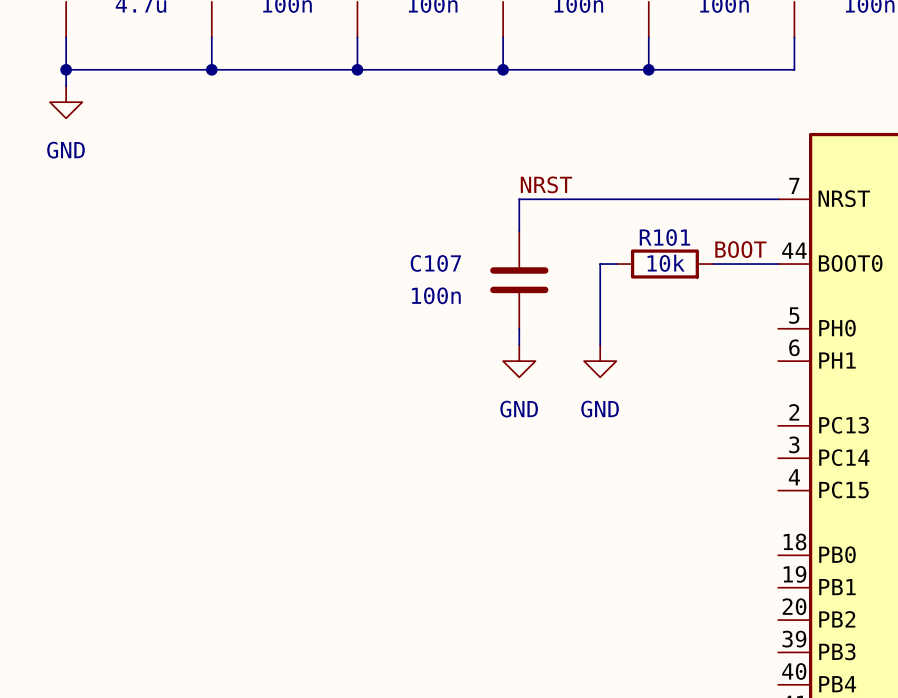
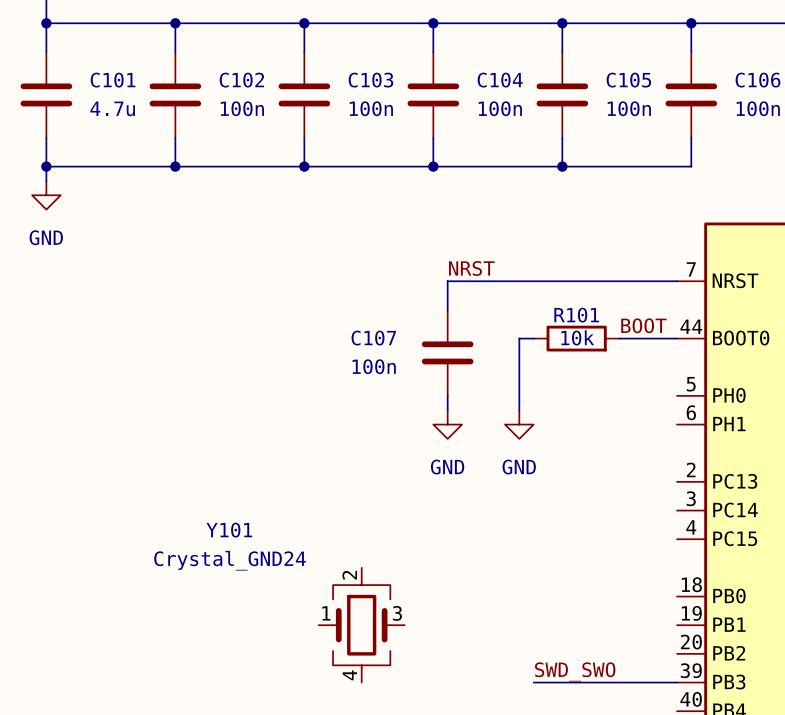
Y101: none -> Crystal_GND24 (361, 625)
label: none -> SWD_SWO (575, 671)
wire: none -> (533, 682) (676, 682)

